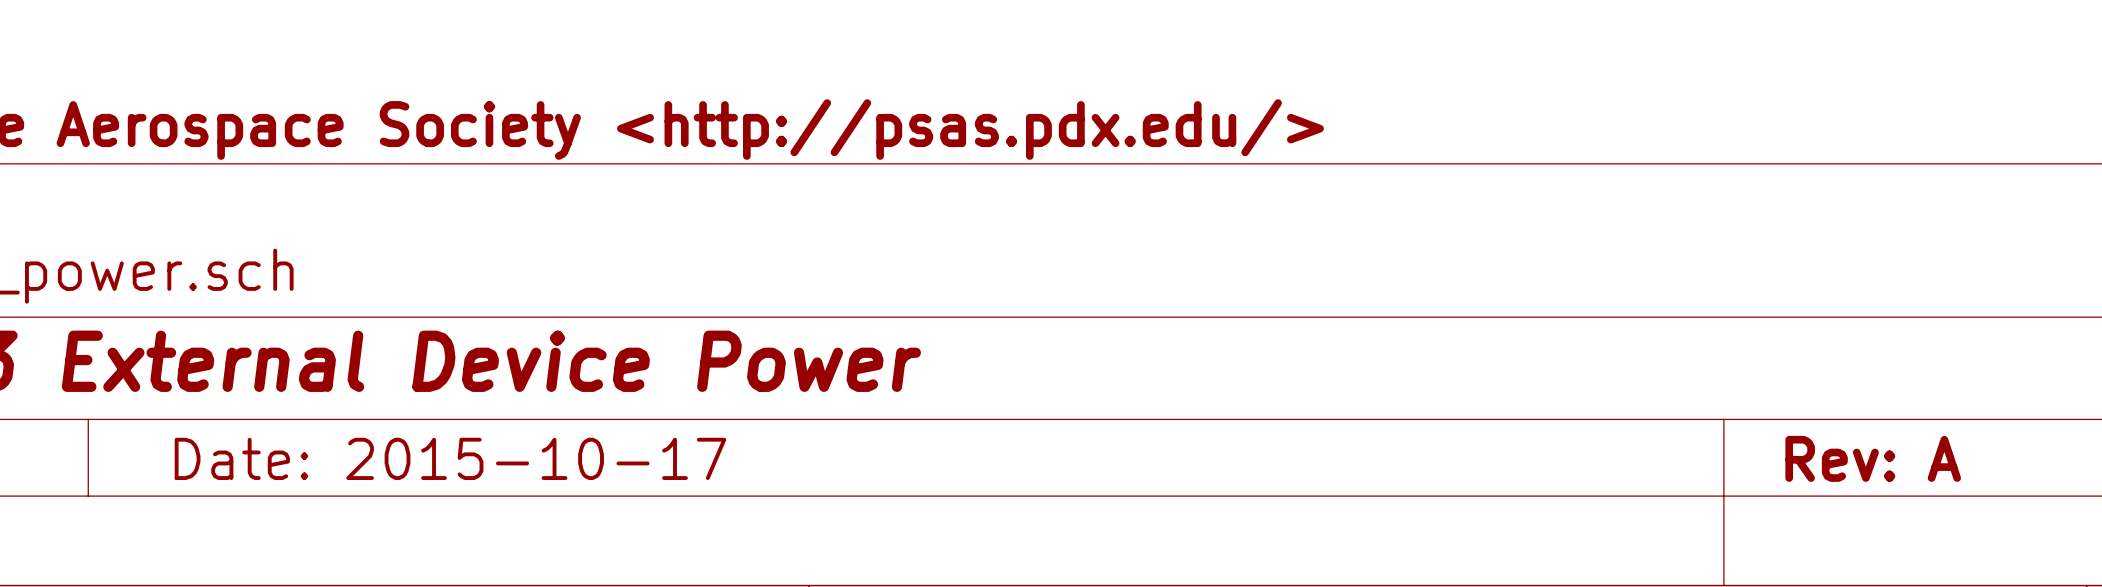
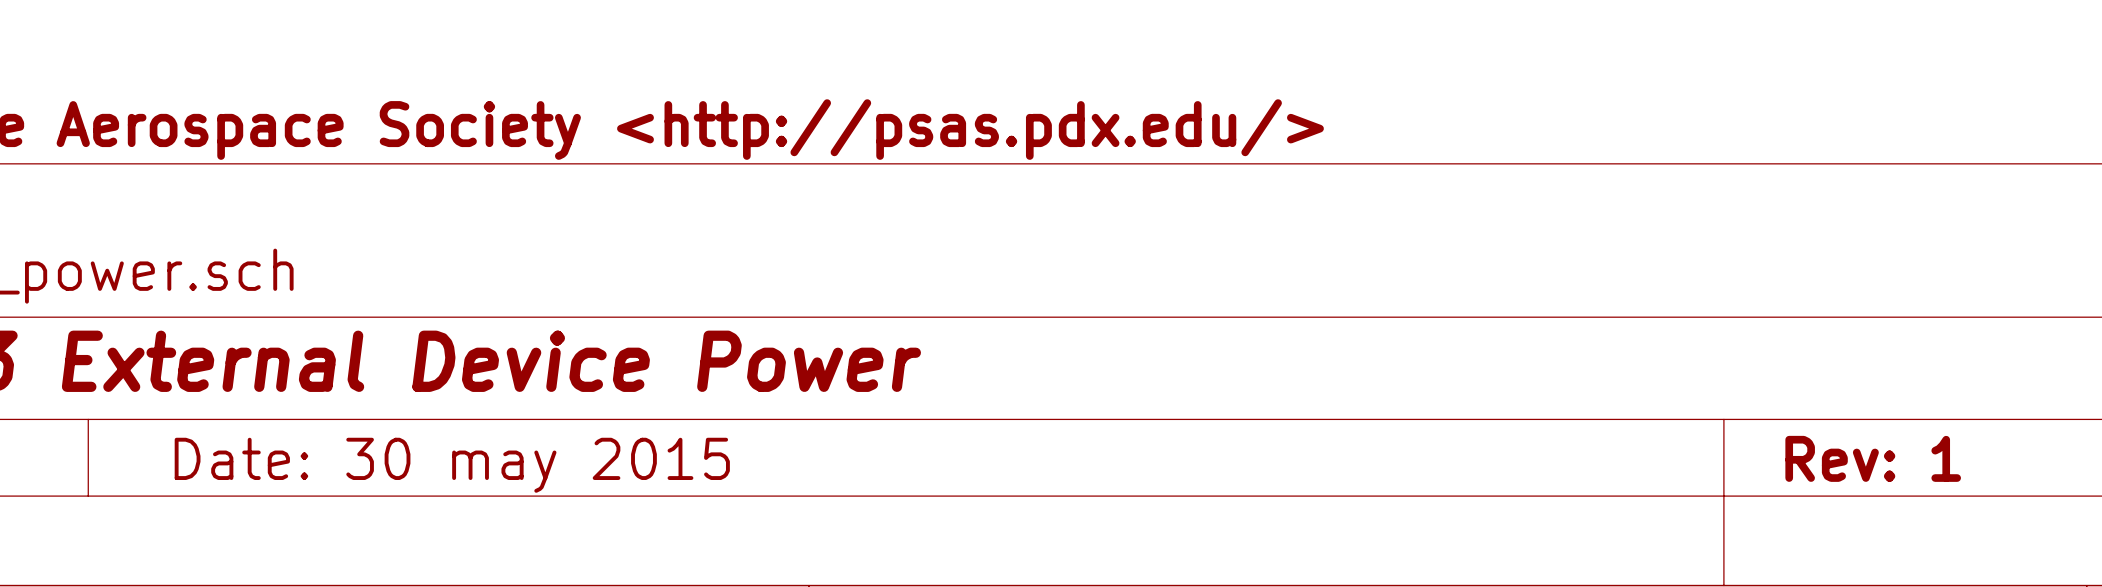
title block: Date: 2015-10-17 (450, 458) -> Date: 30 may 2015 (452, 465)
title block: Rev: A (1873, 458) -> Rev: 1 (1873, 458)

